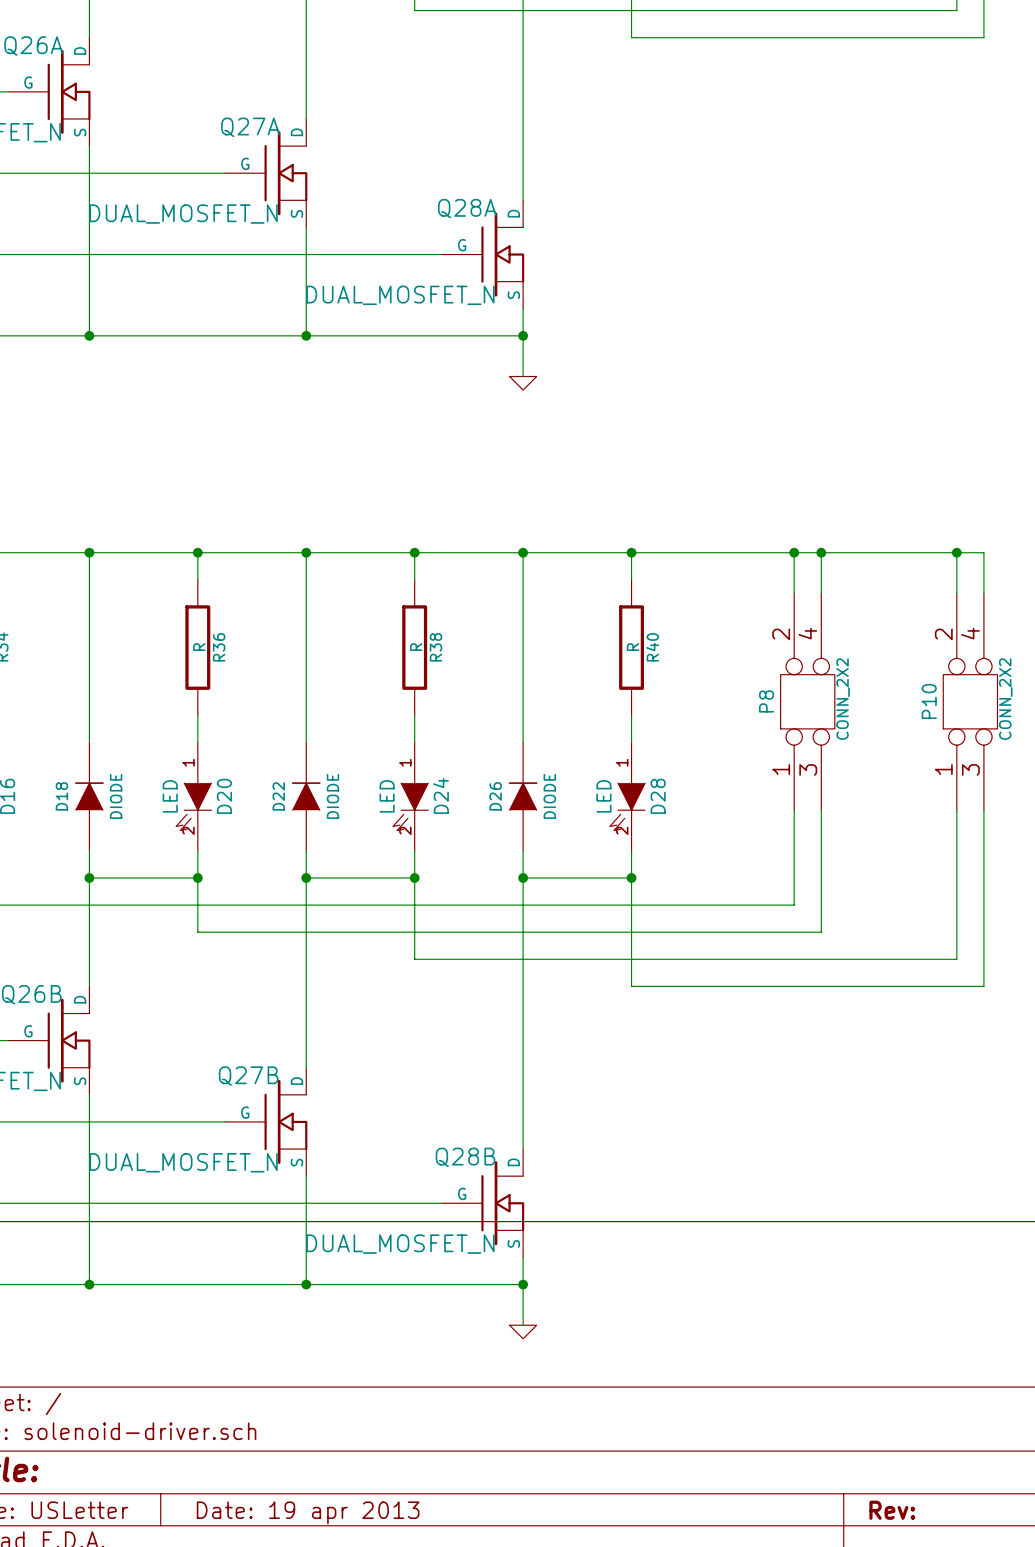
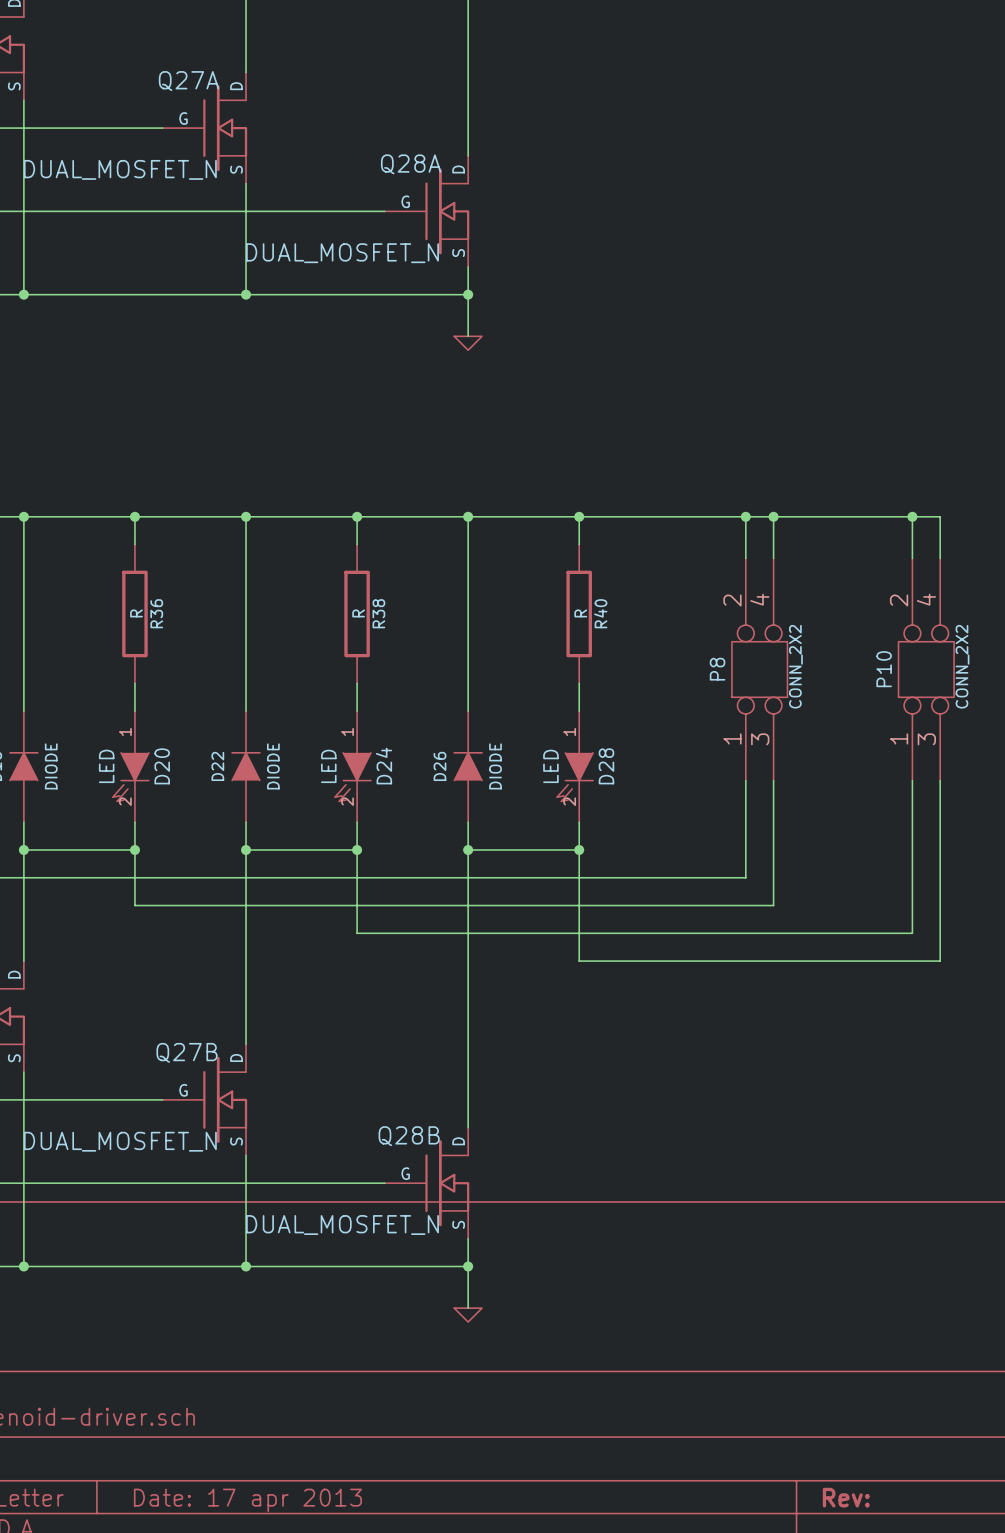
title block: Date: 19 apr 2013 (308, 1512) -> Date: 17 apr 2013 (247, 1500)

